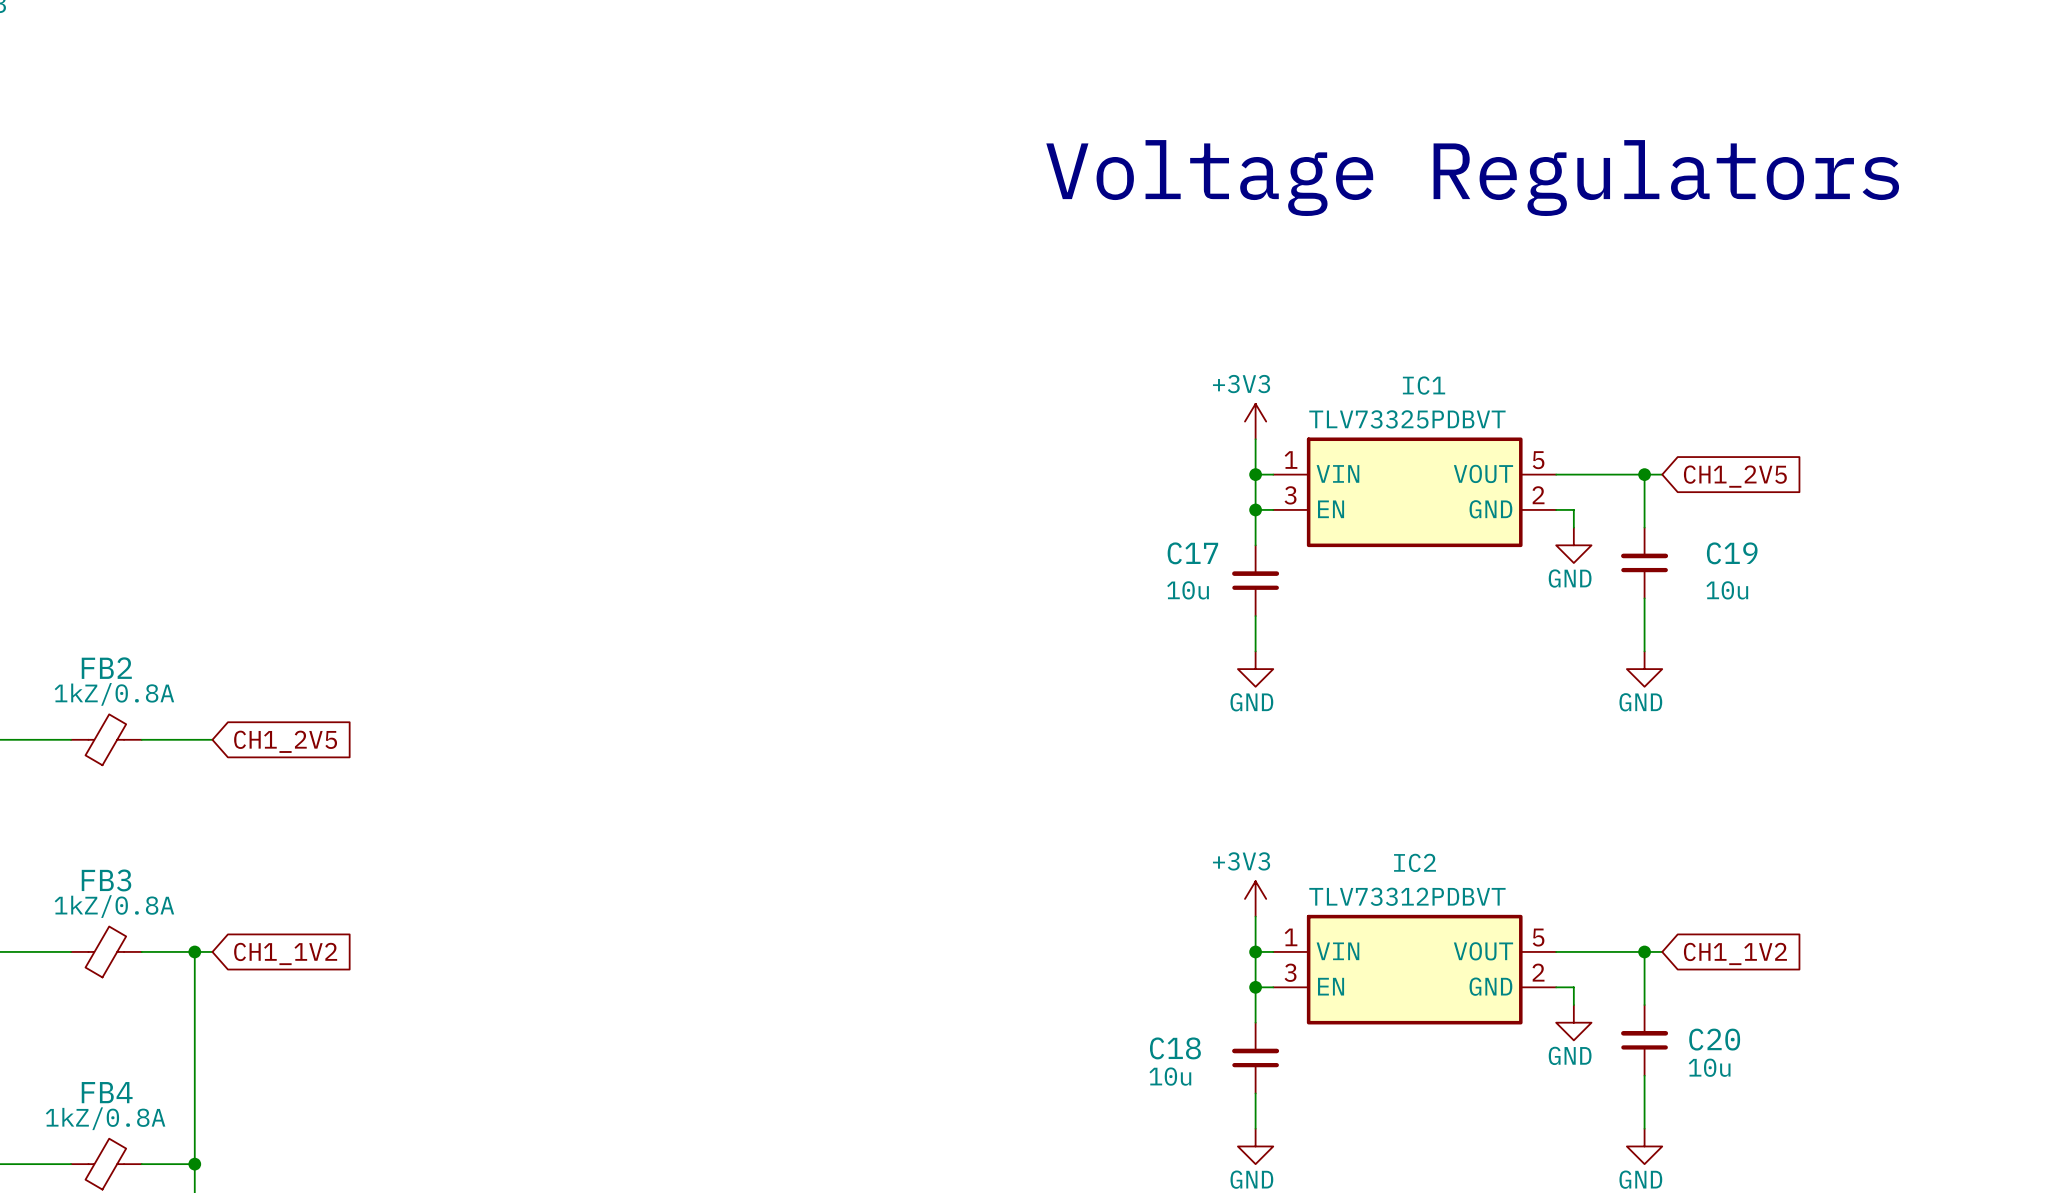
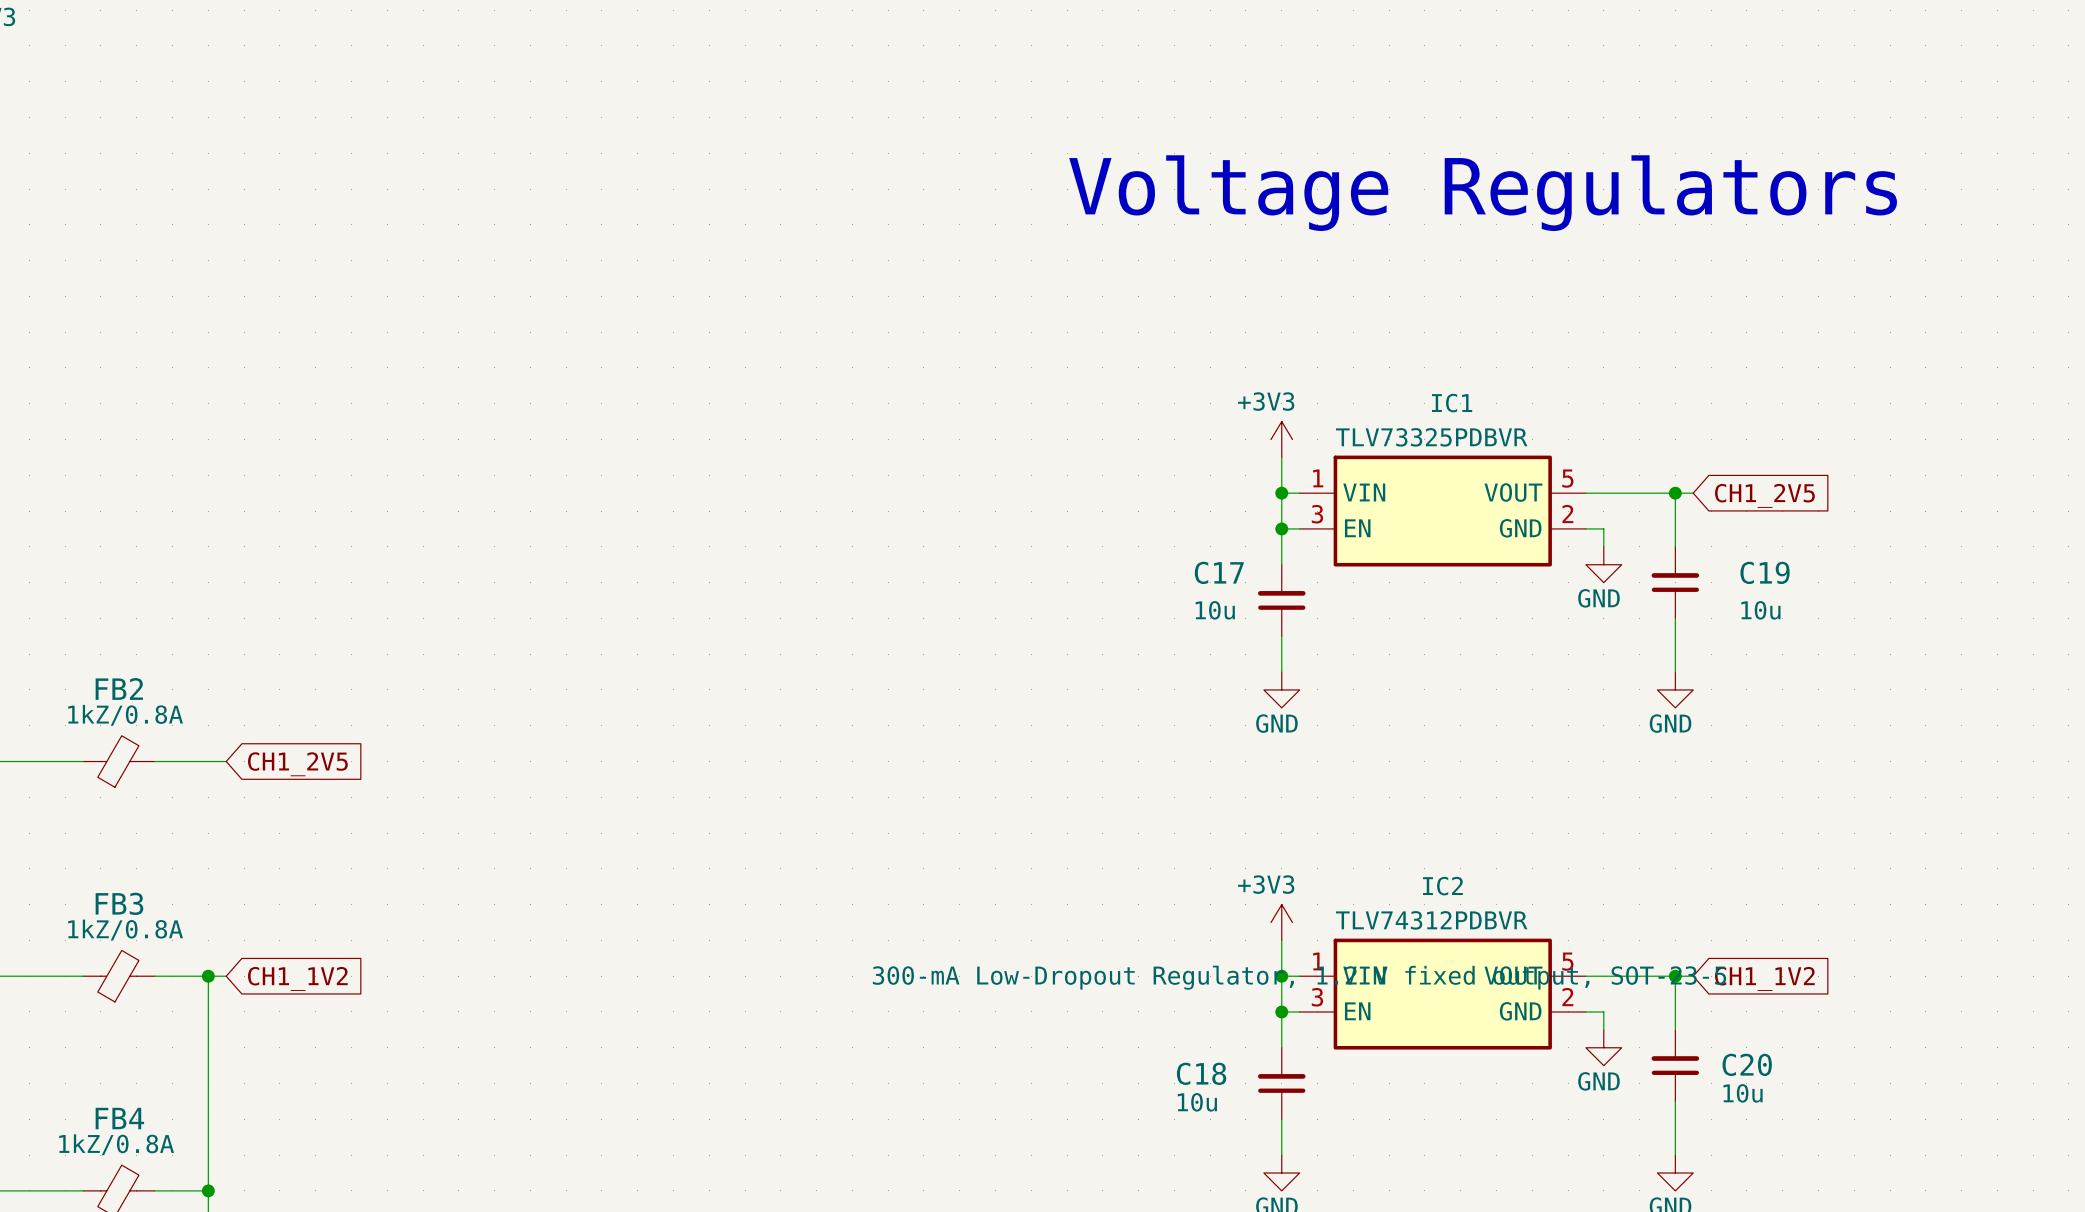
IC1 text: TLV73325PDBVT (1407, 419) -> TLV73325PDBVR (1431, 437)
IC2 text: TLV73312PDBVT (1407, 896) -> TLV74312PDBVR (1431, 920)
IC2 text: none -> 300-mA Low-Dropout Regulator, 1.2 V fixed output, SOT-23-5 (1299, 977)

